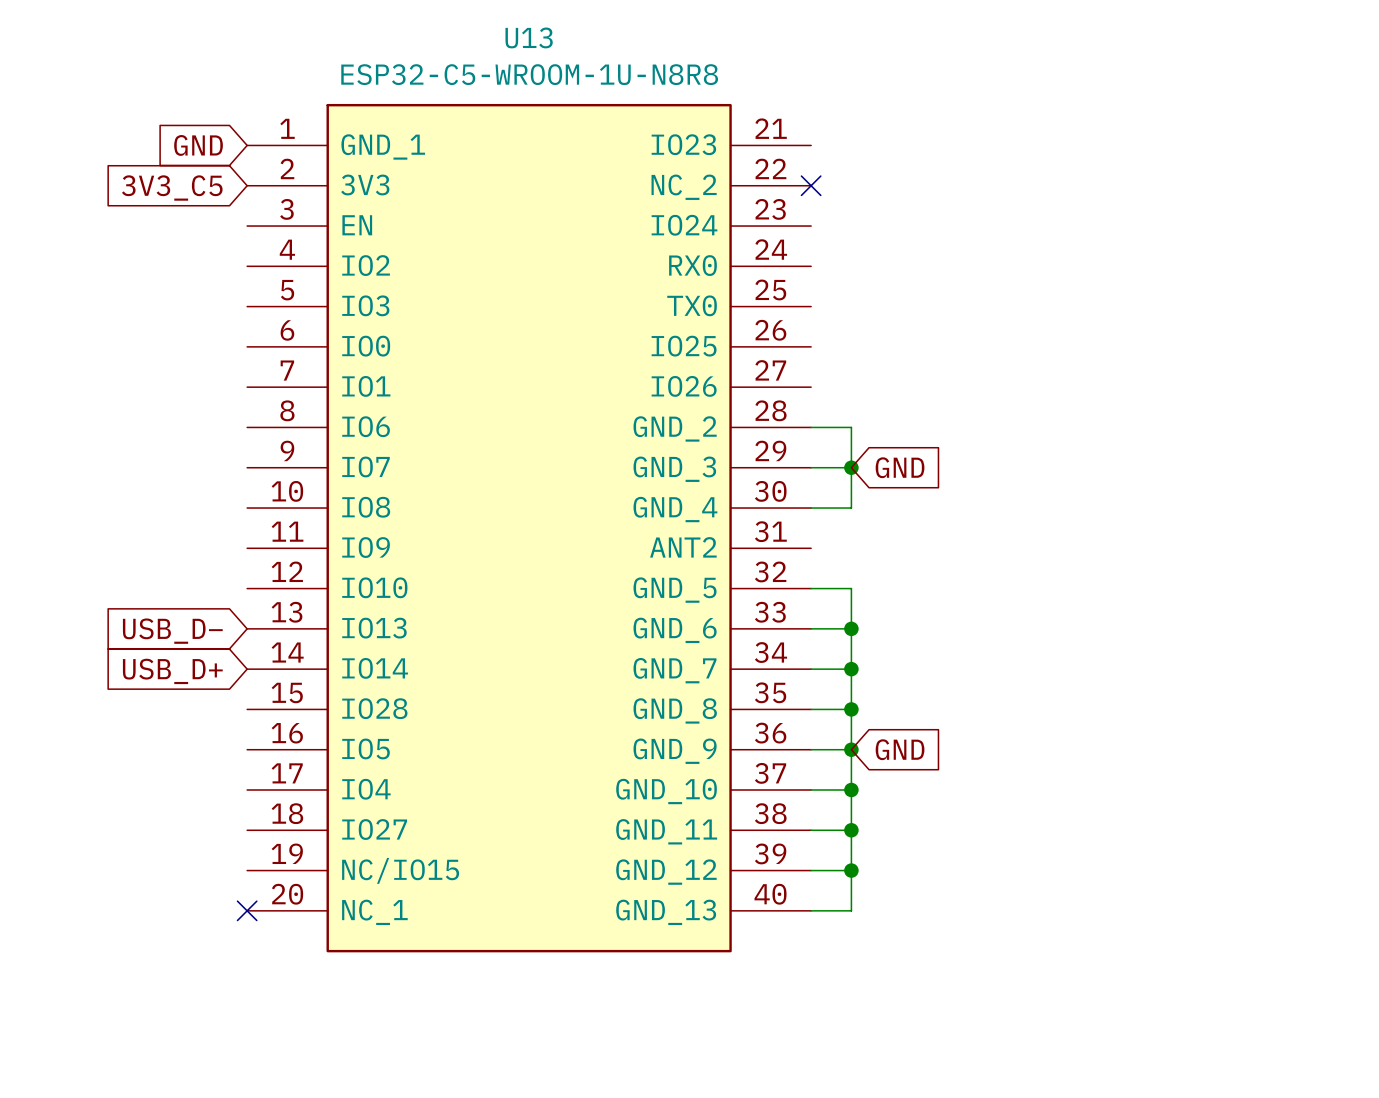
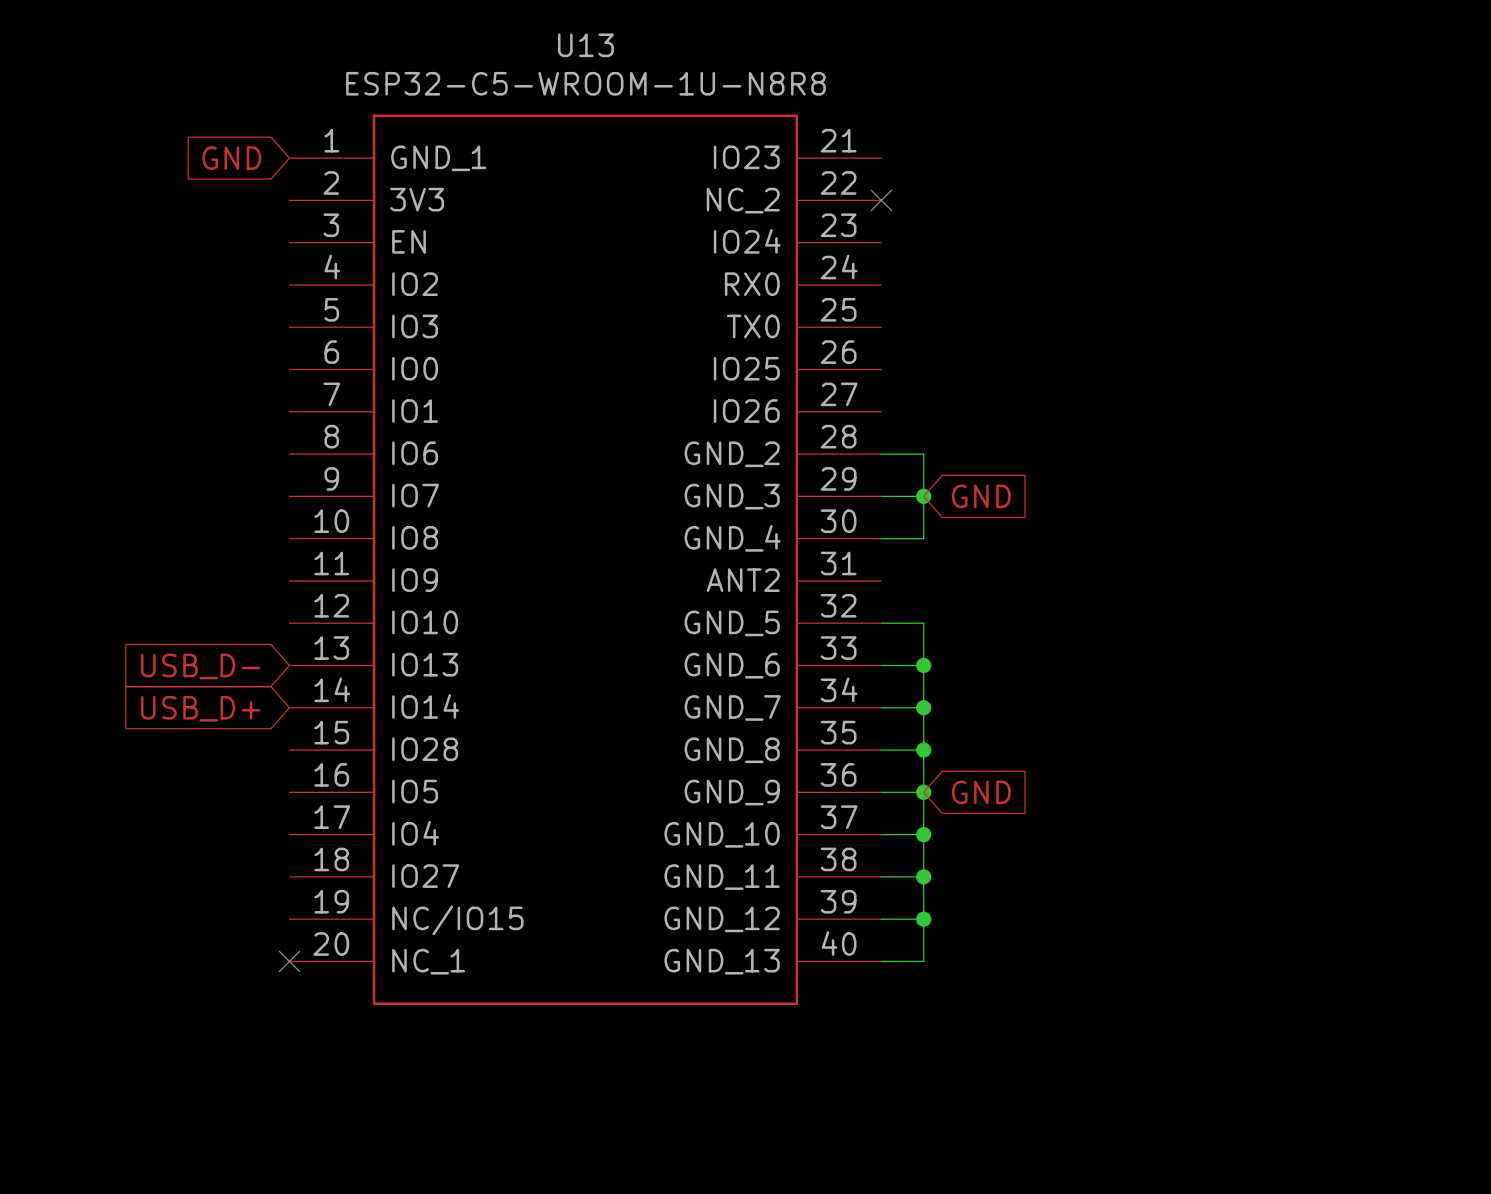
global label: 3V3_C5 (172, 188) -> none

